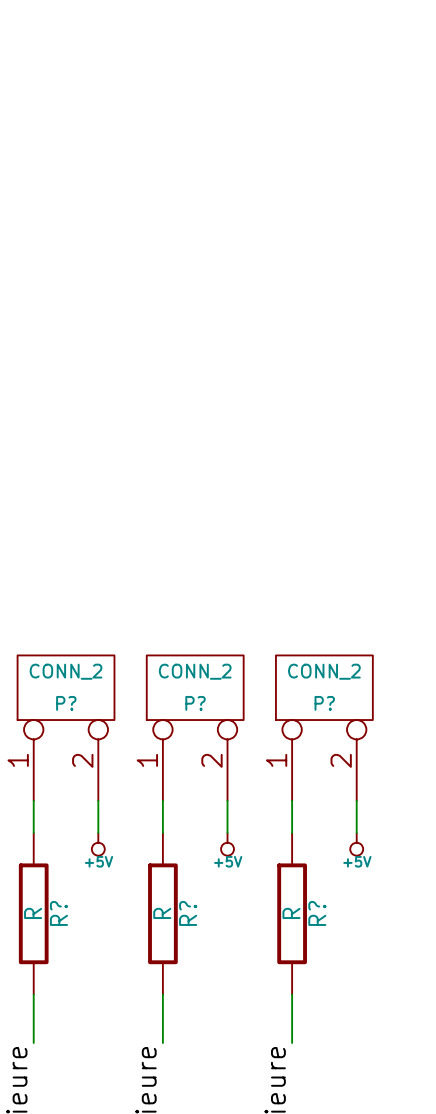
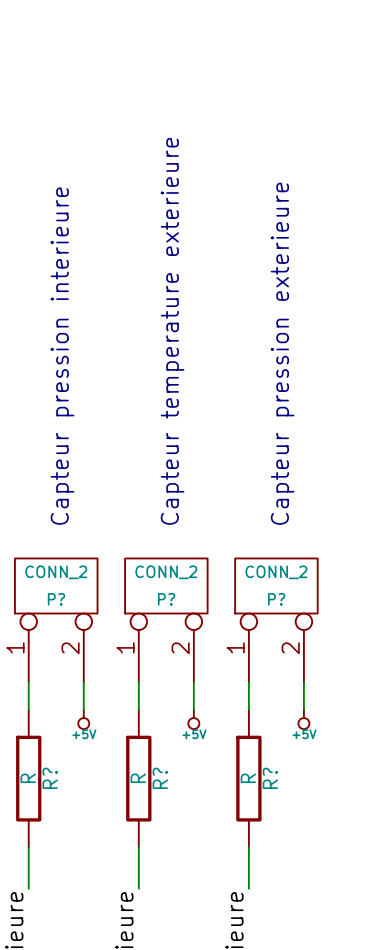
text: none -> Capteur temperature exterieure (172, 331)
text: none -> Capteur pression exterieure (282, 353)
text: none -> Capteur pression interieure (62, 356)

